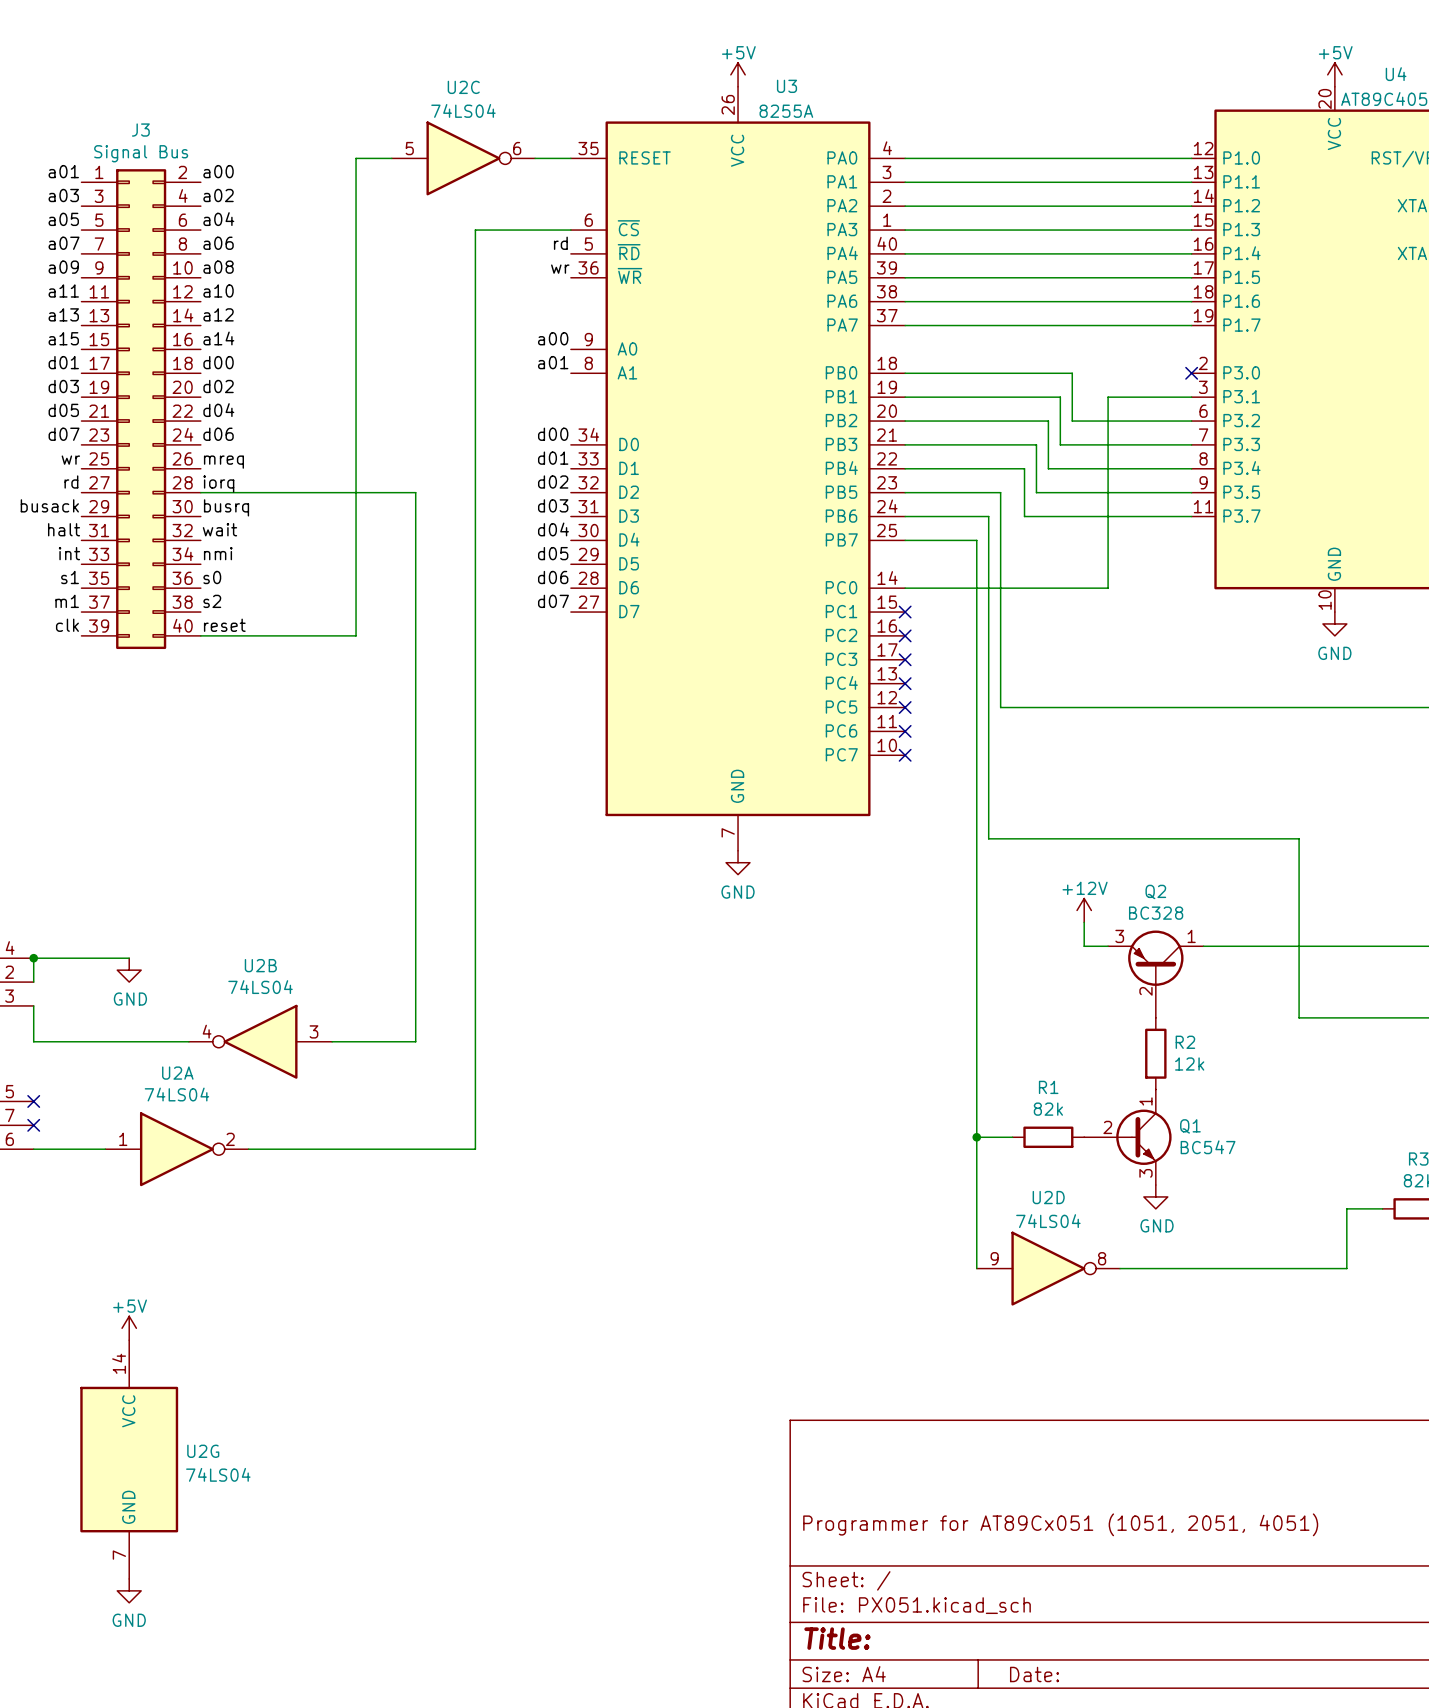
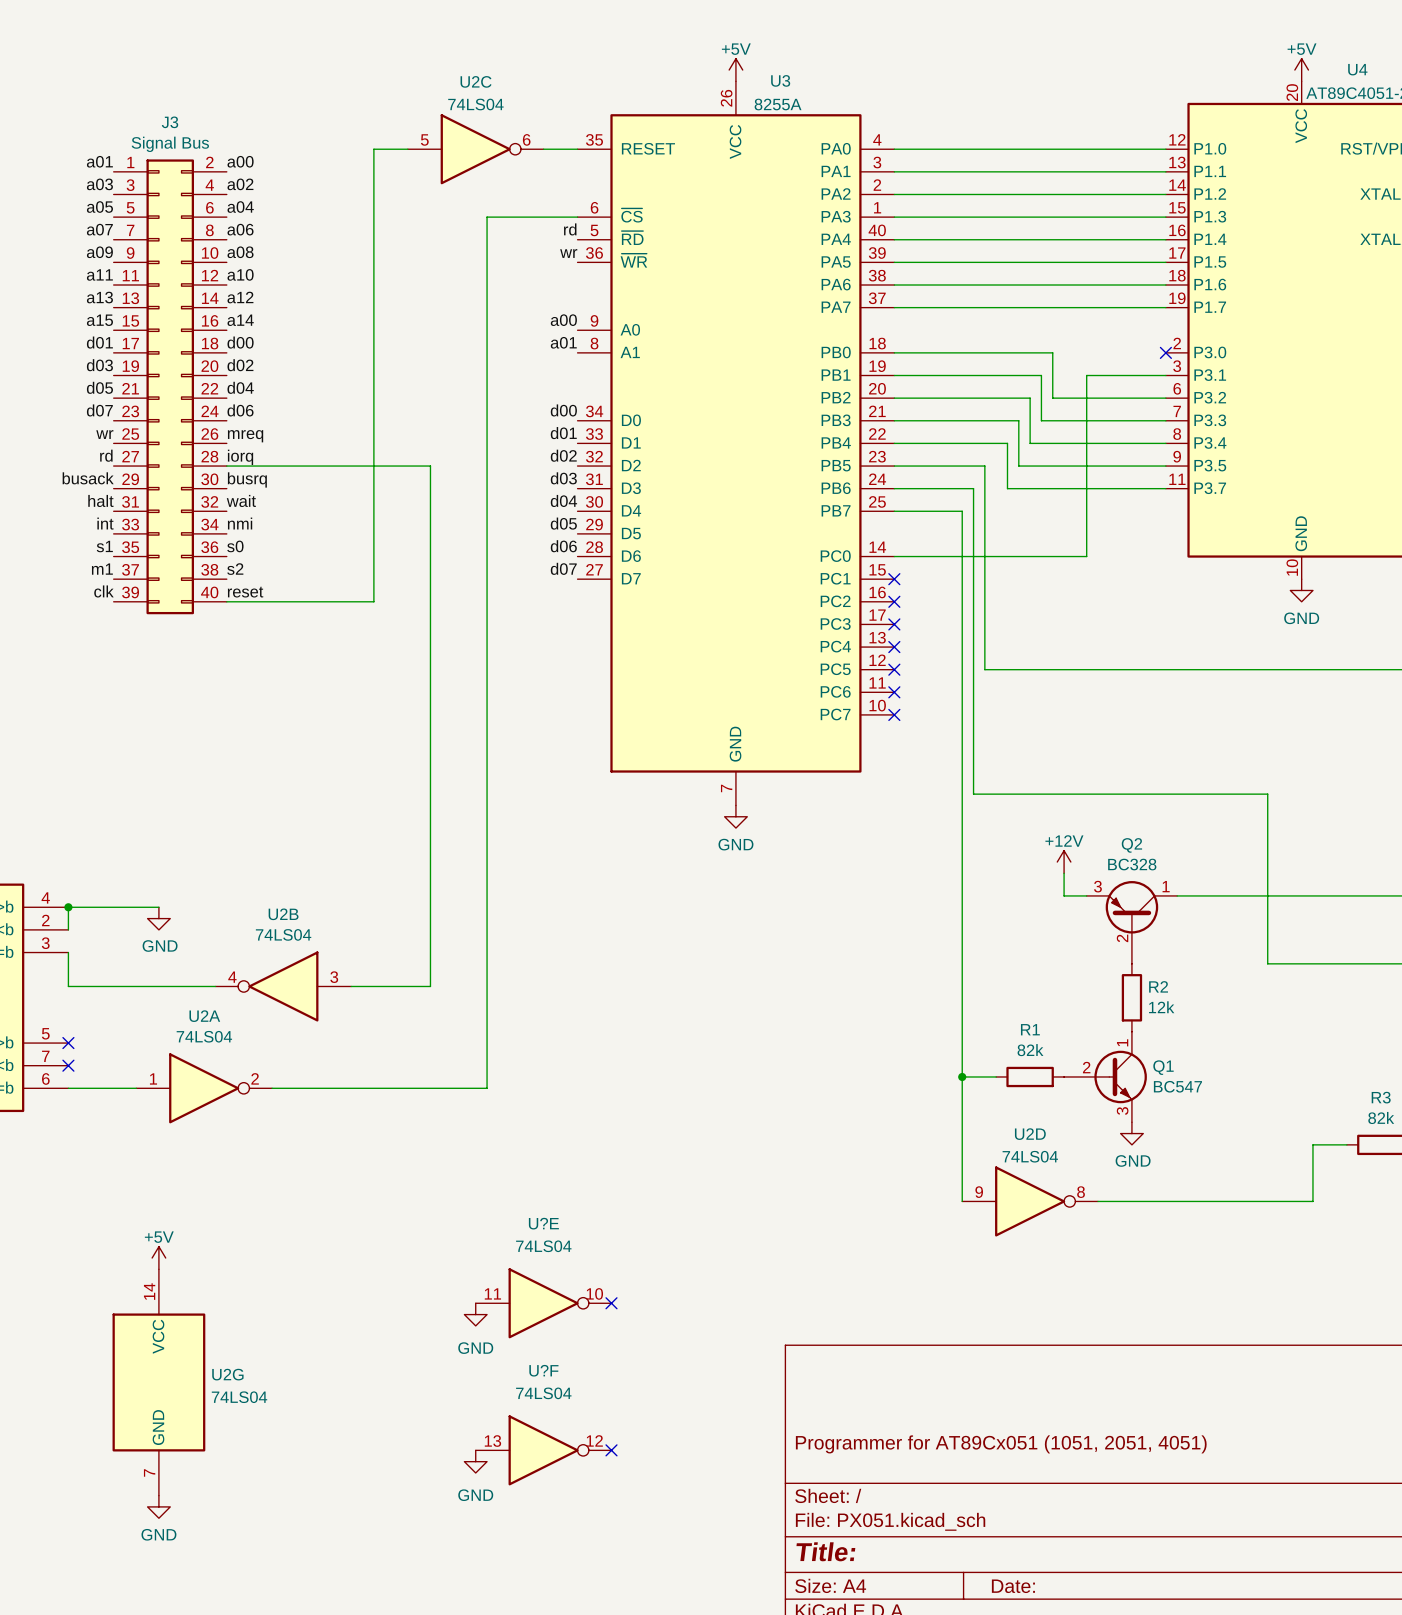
U?E: none -> 74LS04 (543, 1303)
no-connect mark: none -> (611, 1303)
power symbol: none -> GND (475, 1314)
U?F: none -> 74LS04 (543, 1450)
no-connect mark: none -> (611, 1450)
power symbol: none -> GND (475, 1461)

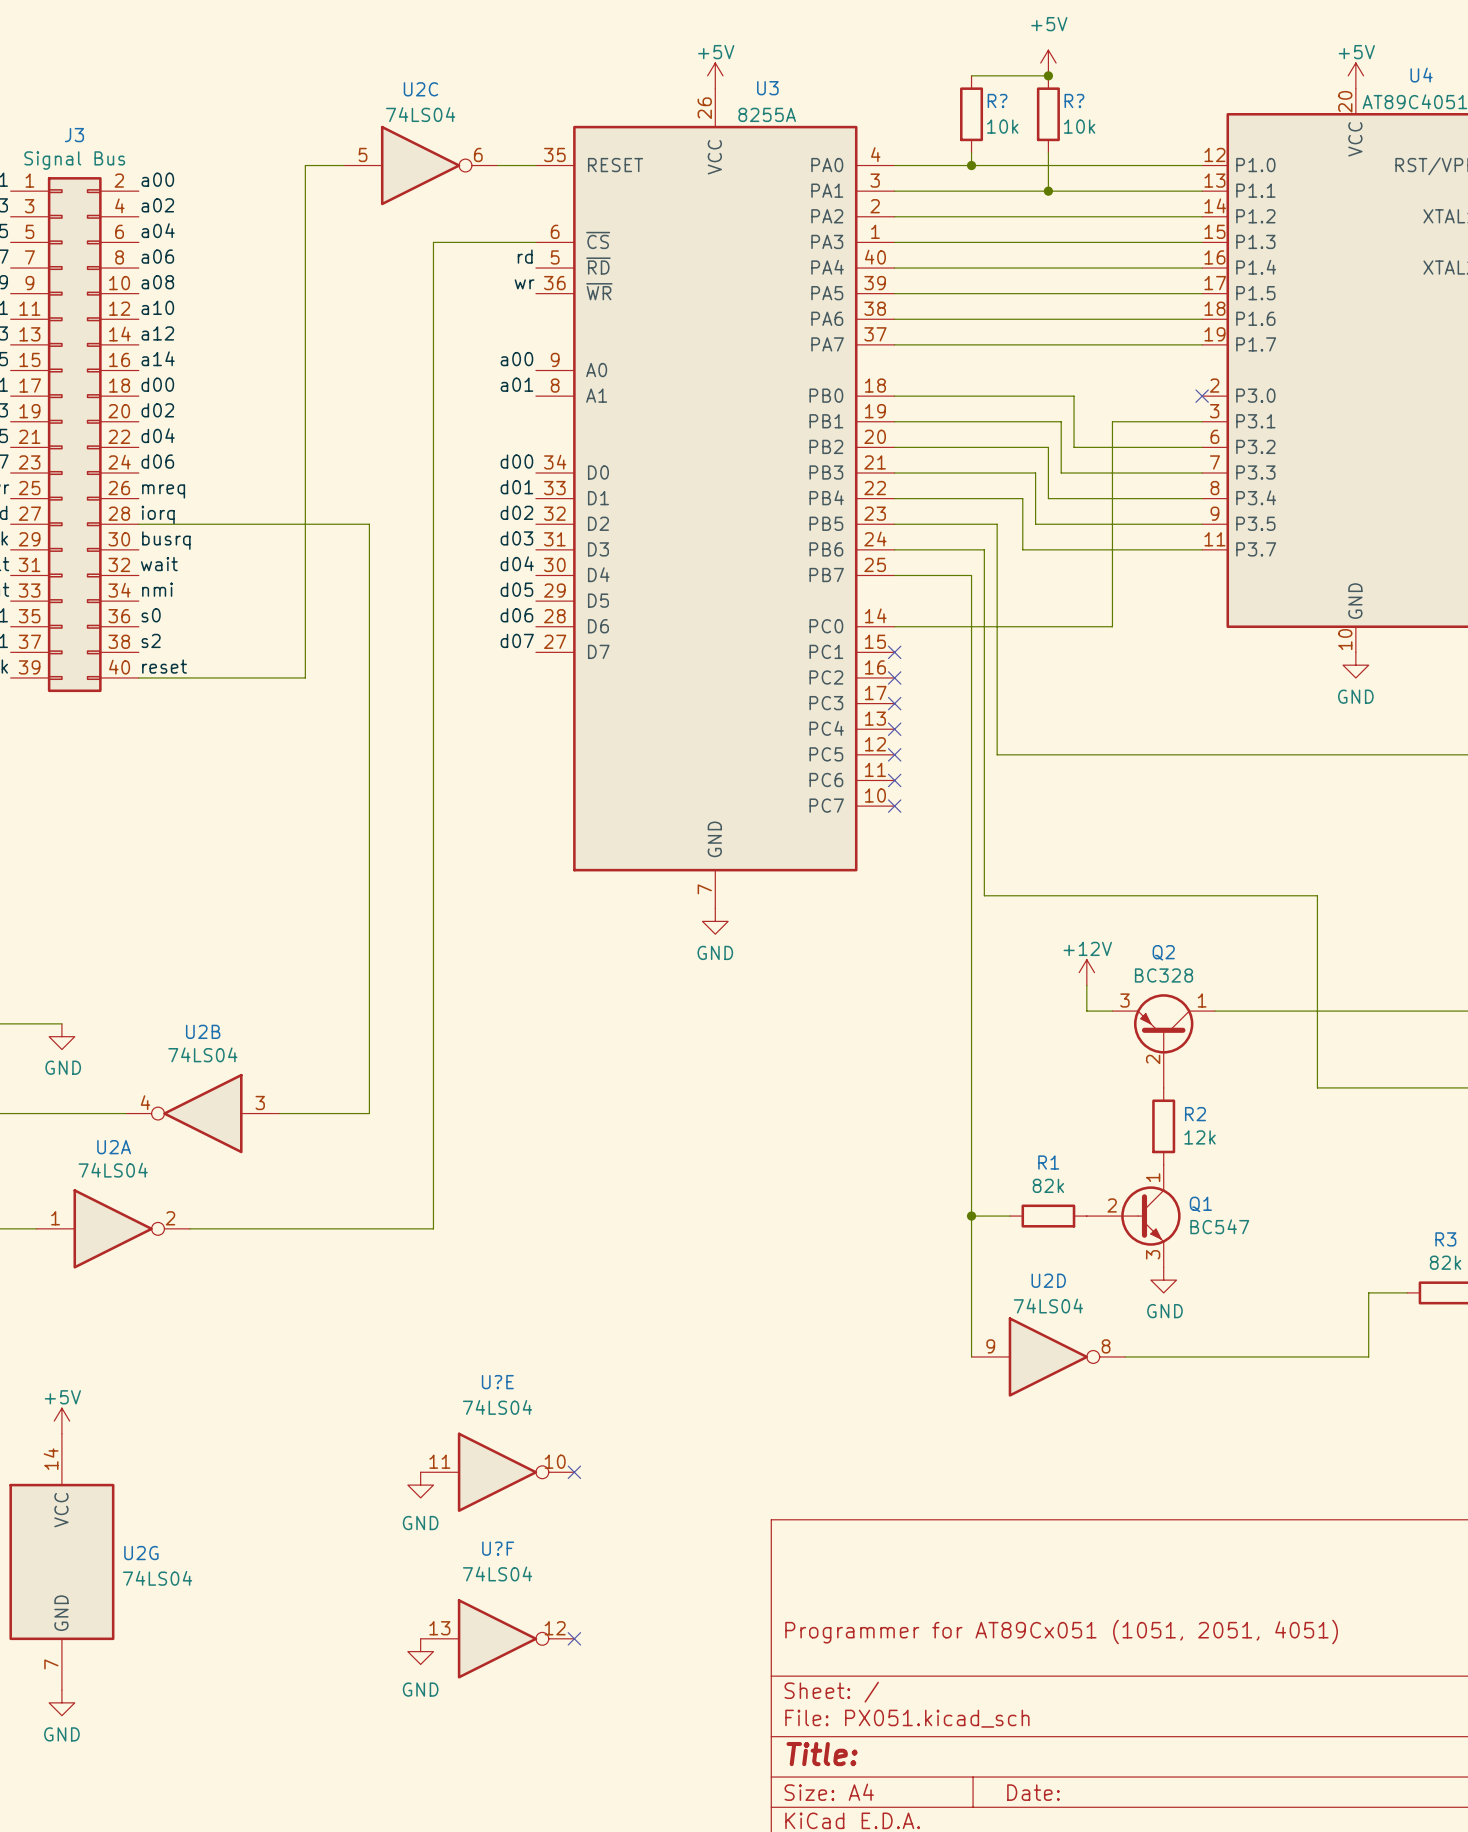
power symbol: none -> +5V (1048, 63)
wire: none -> (971, 75) (1048, 75)
junction: none -> (1048, 75)
R?: none -> 10k (971, 114)
R?: none -> 10k (1048, 114)
wire: none -> (971, 152) (971, 165)
wire: none -> (1048, 152) (1048, 191)
junction: none -> (971, 165)
junction: none -> (1048, 191)

